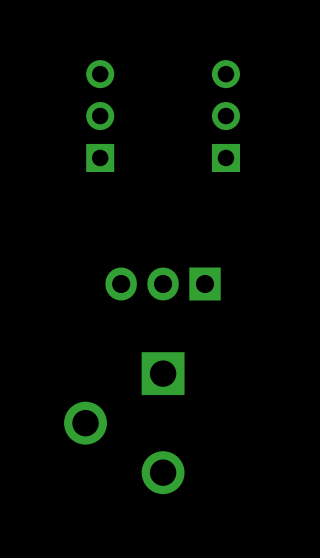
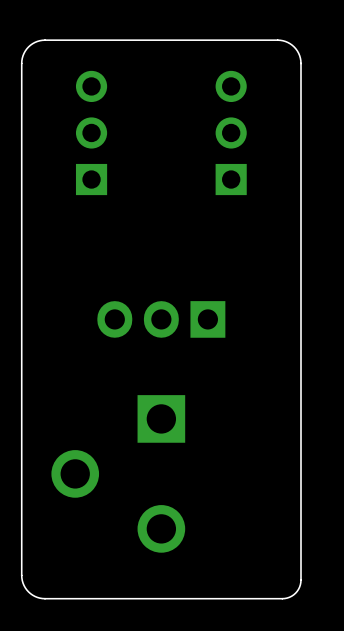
board edge: none -> (277, 40) (45, 40) (32, 43) (24, 53) (21, 63) (21, 575) (25, 587) (34, 596) (45, 598) (282, 598) (293, 594) (299, 587) (300, 63) (298, 53) (294, 46) (287, 42) (277, 40)

